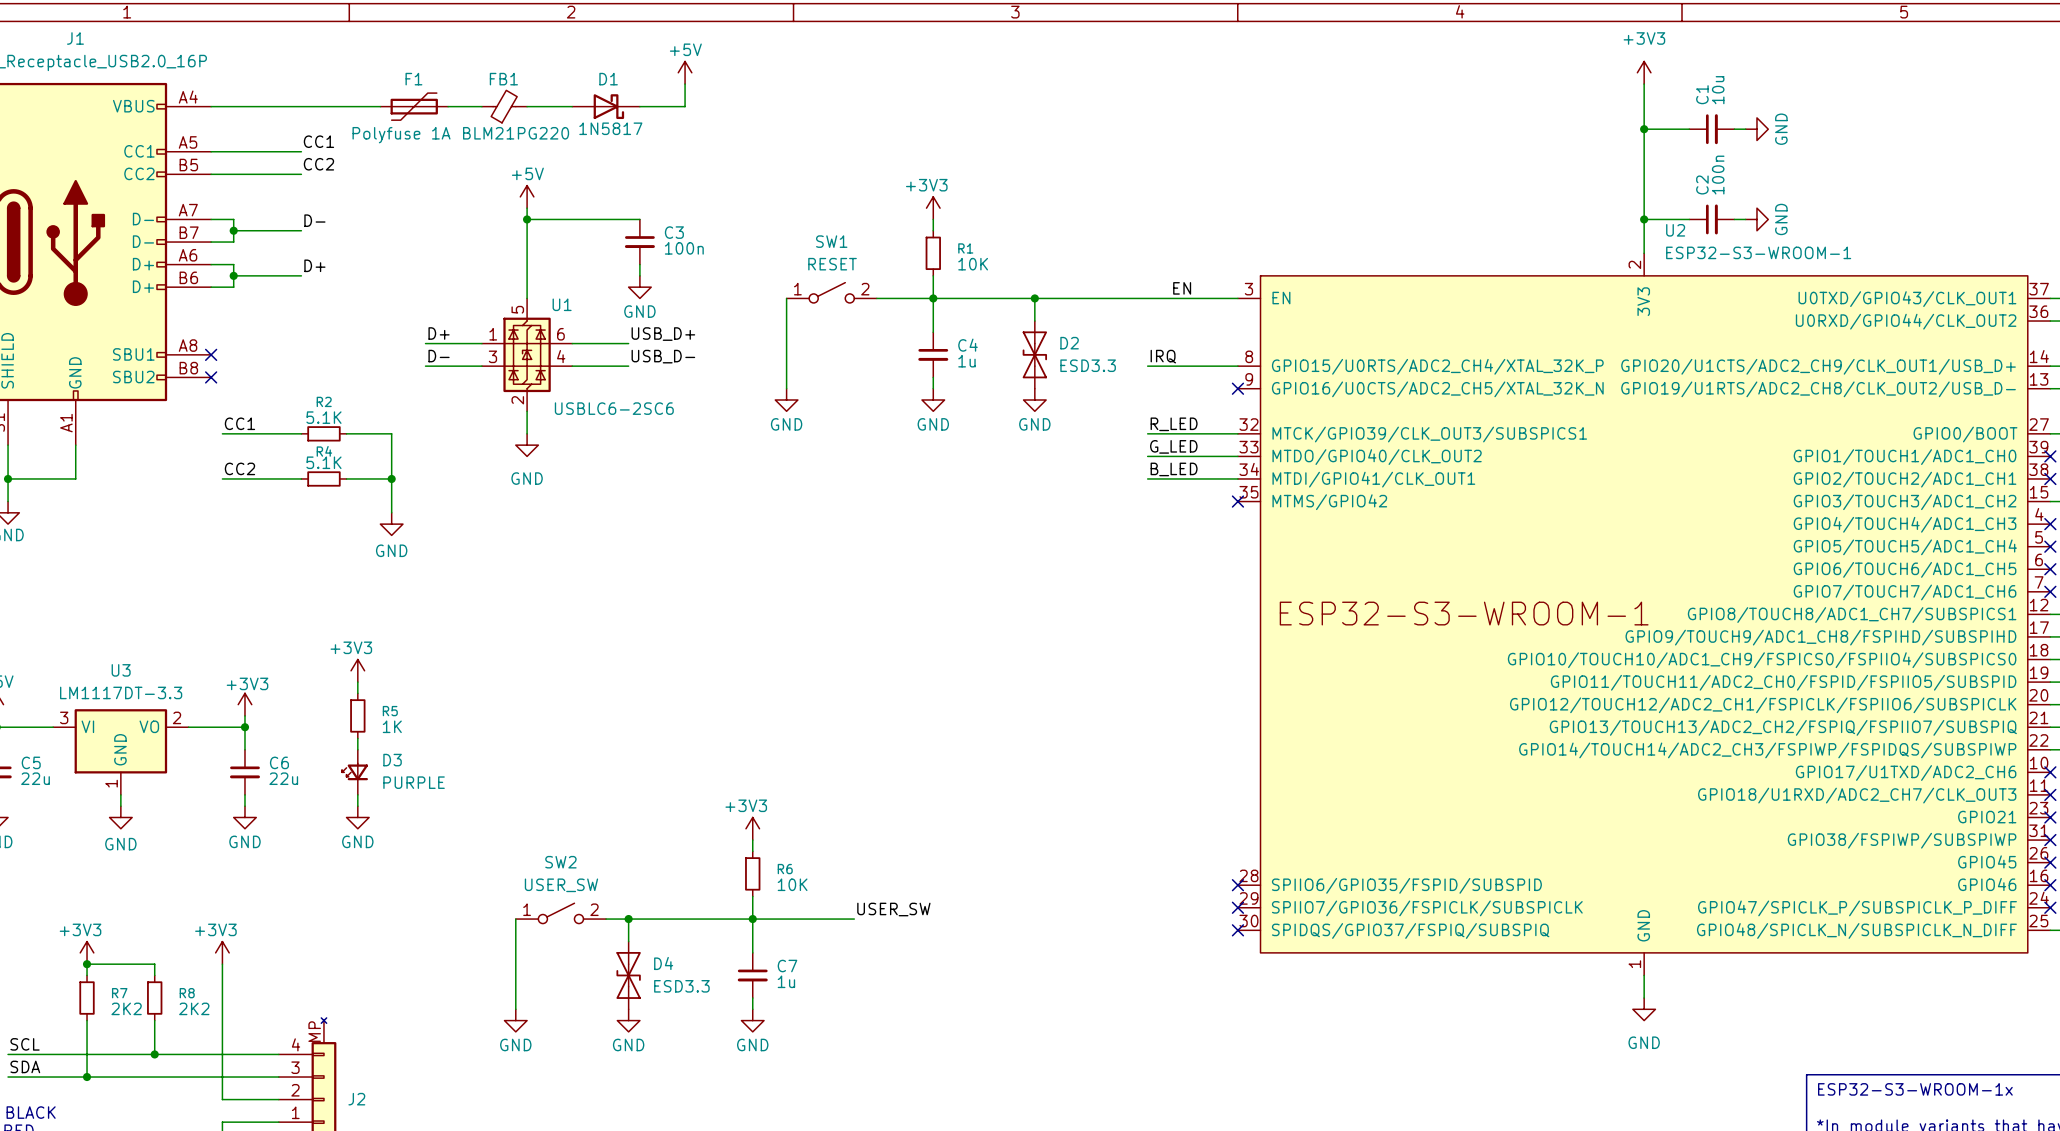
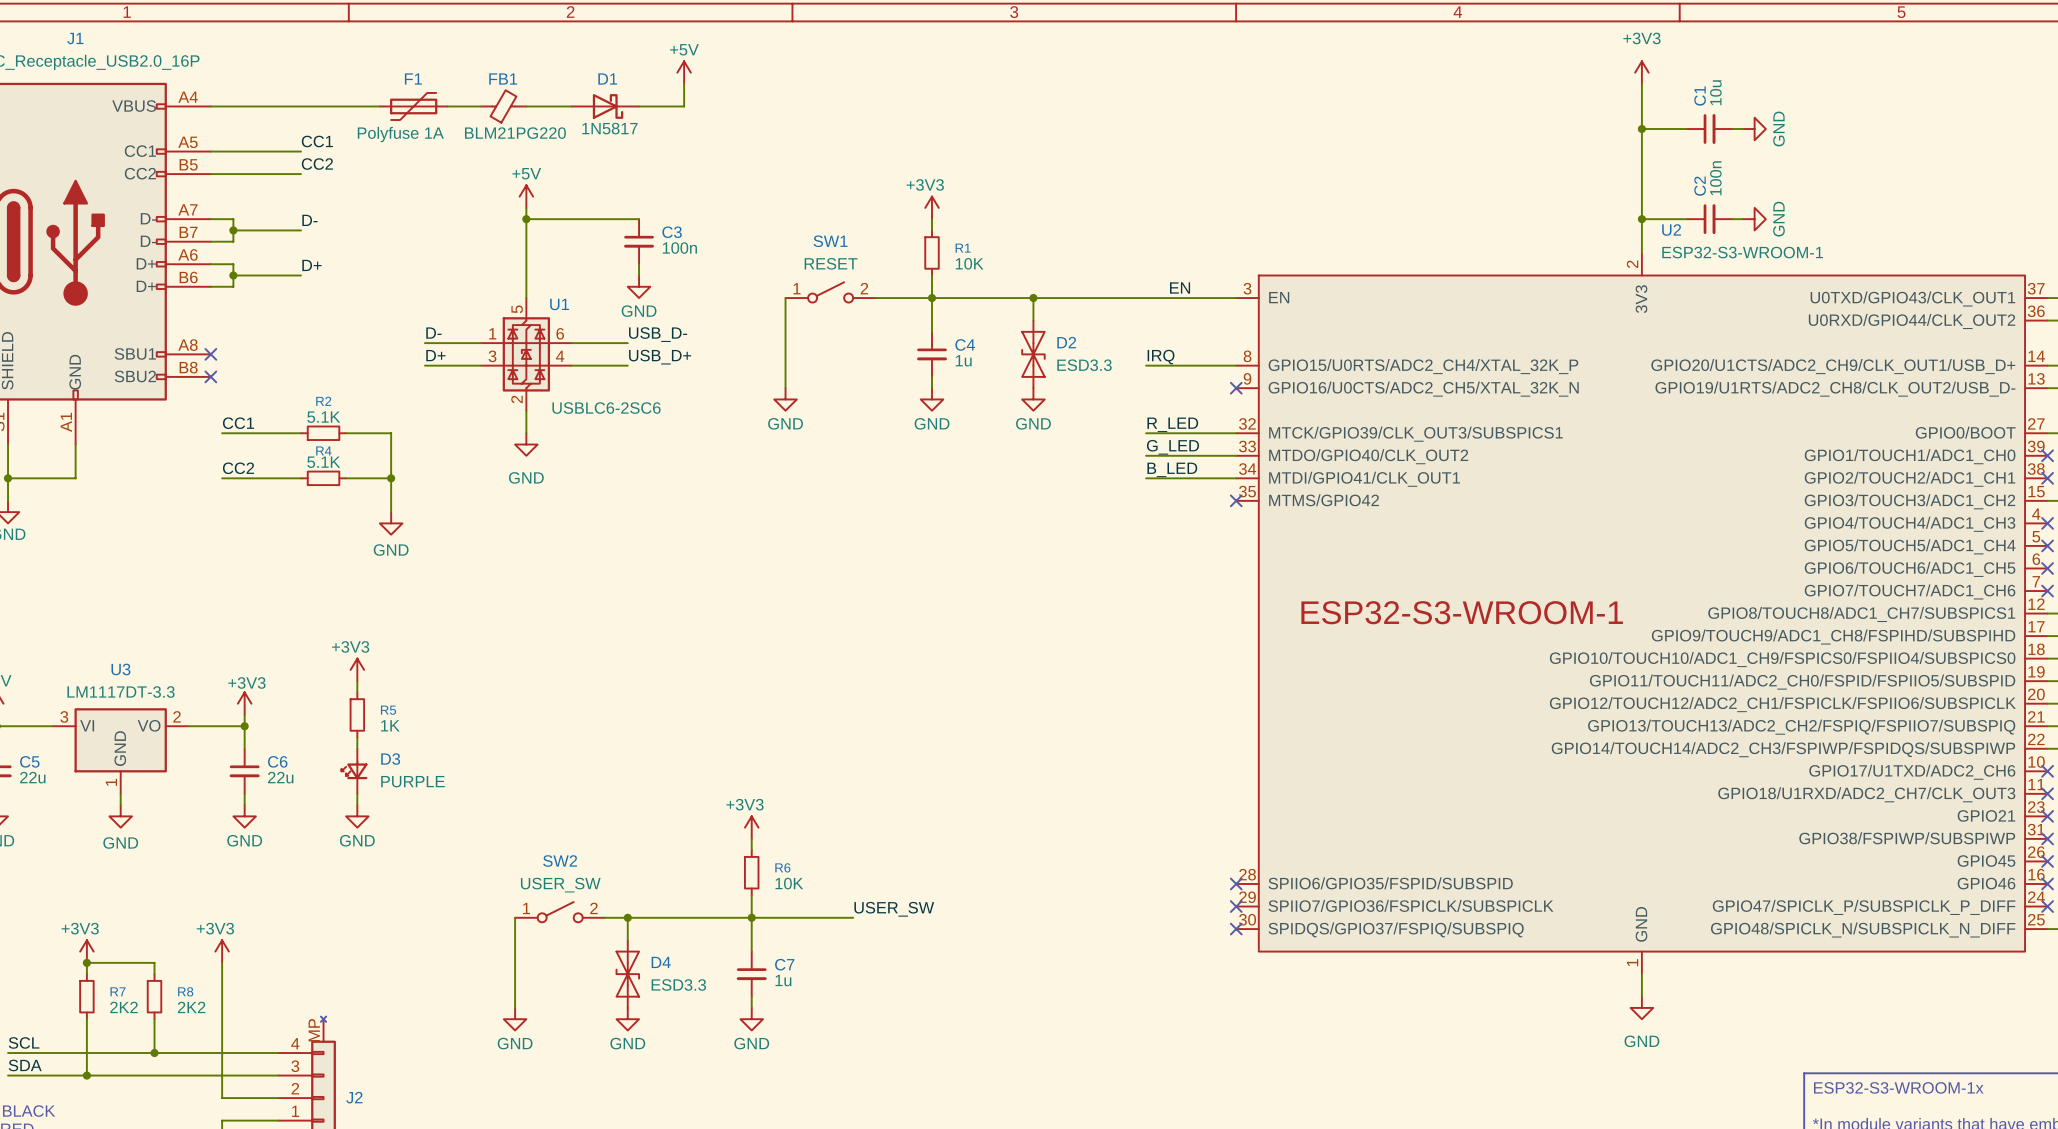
label: D+ (439, 333) -> D- (433, 333)
label: USB_D+ (663, 334) -> USB_D- (658, 334)
label: D- (439, 356) -> D+ (435, 355)
label: USB_D- (663, 356) -> USB_D+ (660, 357)

